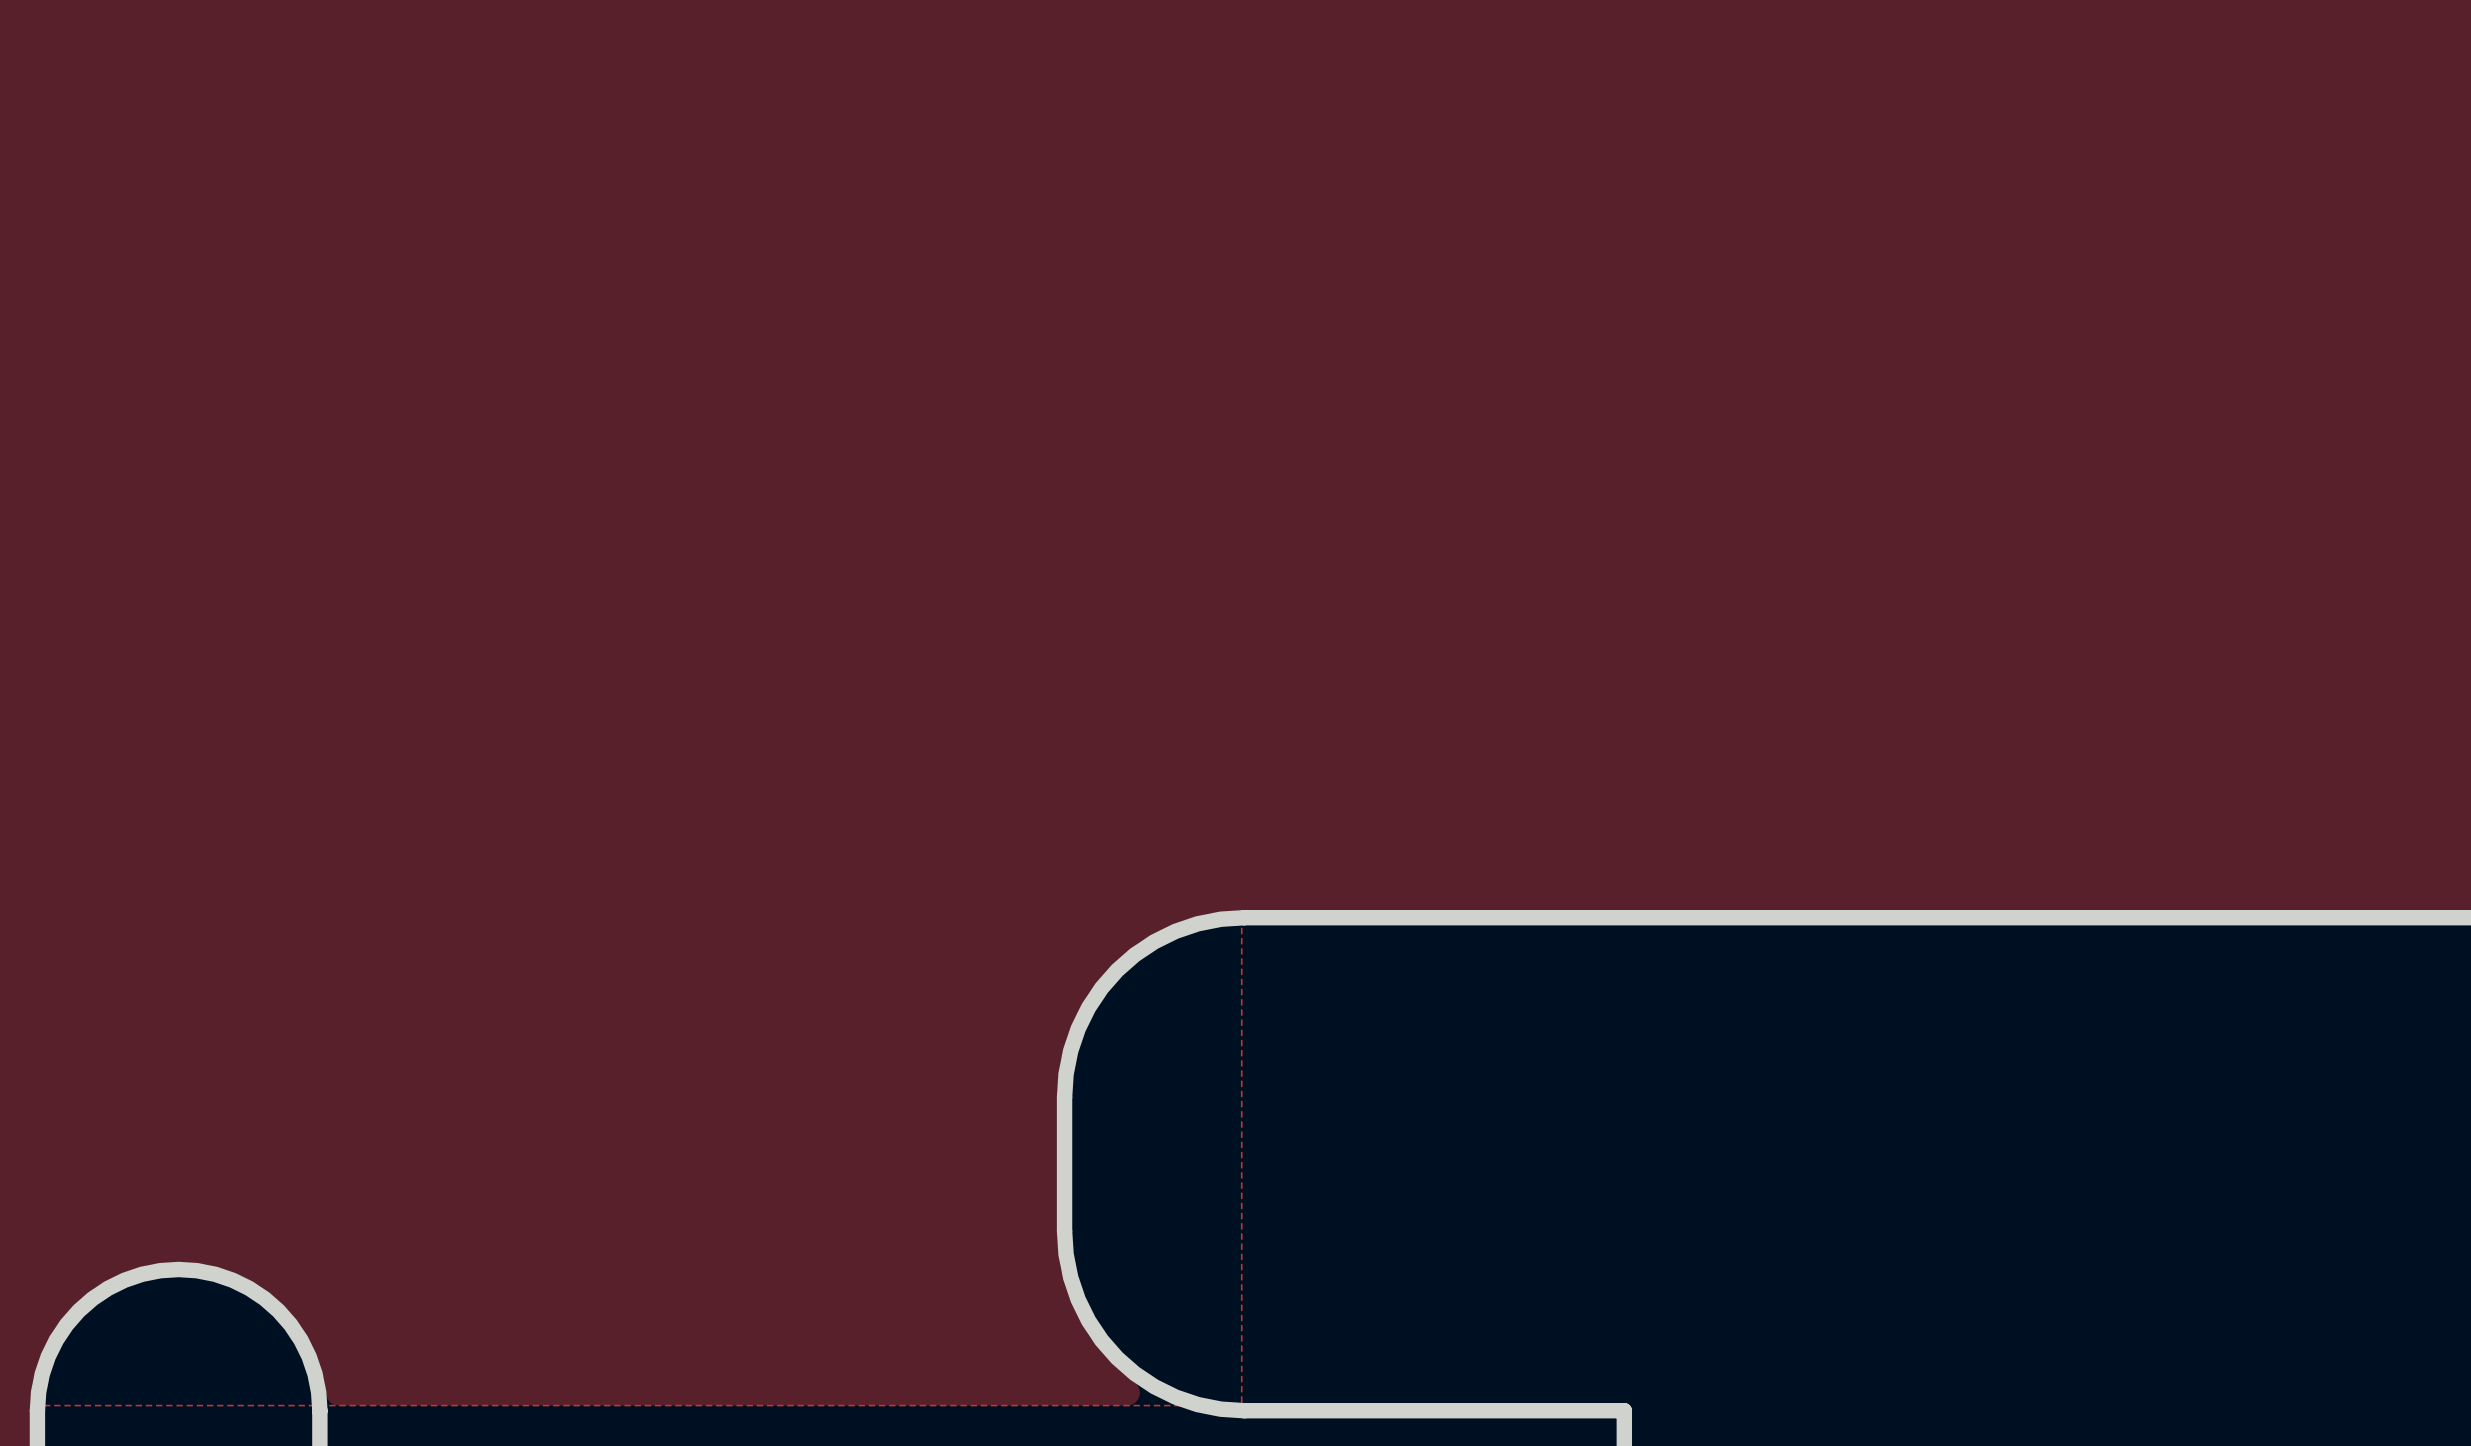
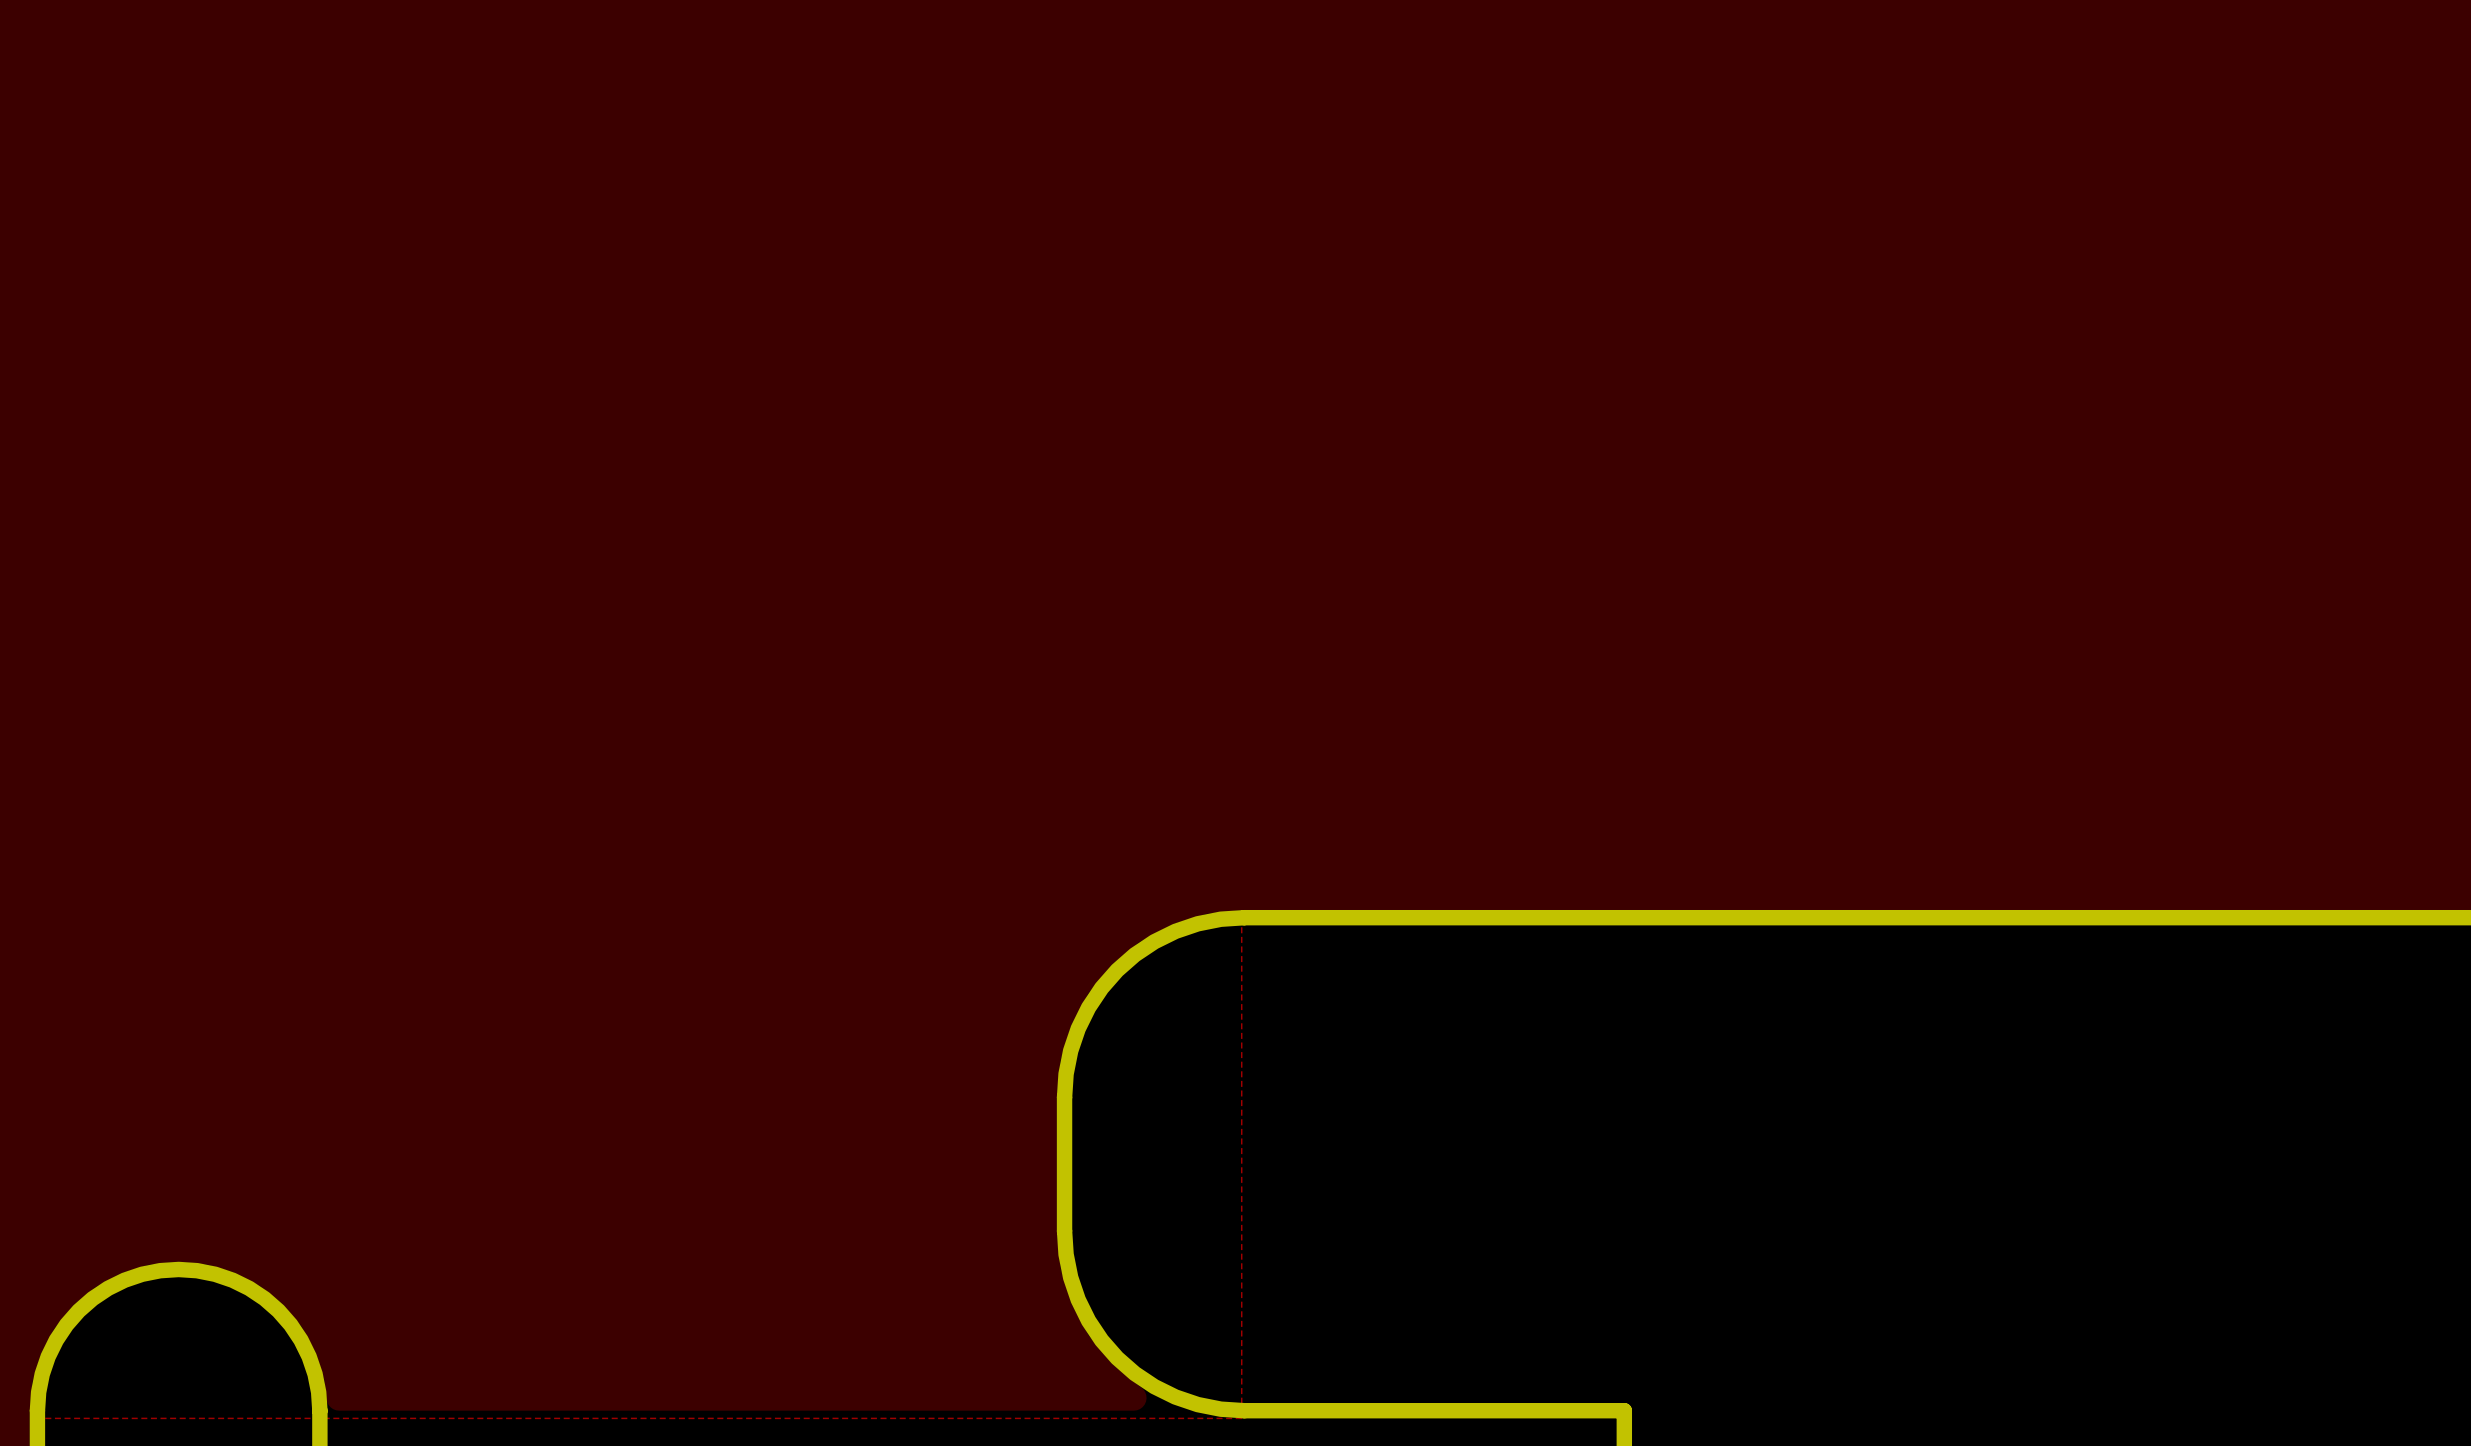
zone outline: (1241, 1405) (34, 1405) (34, 1418) -> (1241, 1405) (1241, 1418) (34, 1418)

